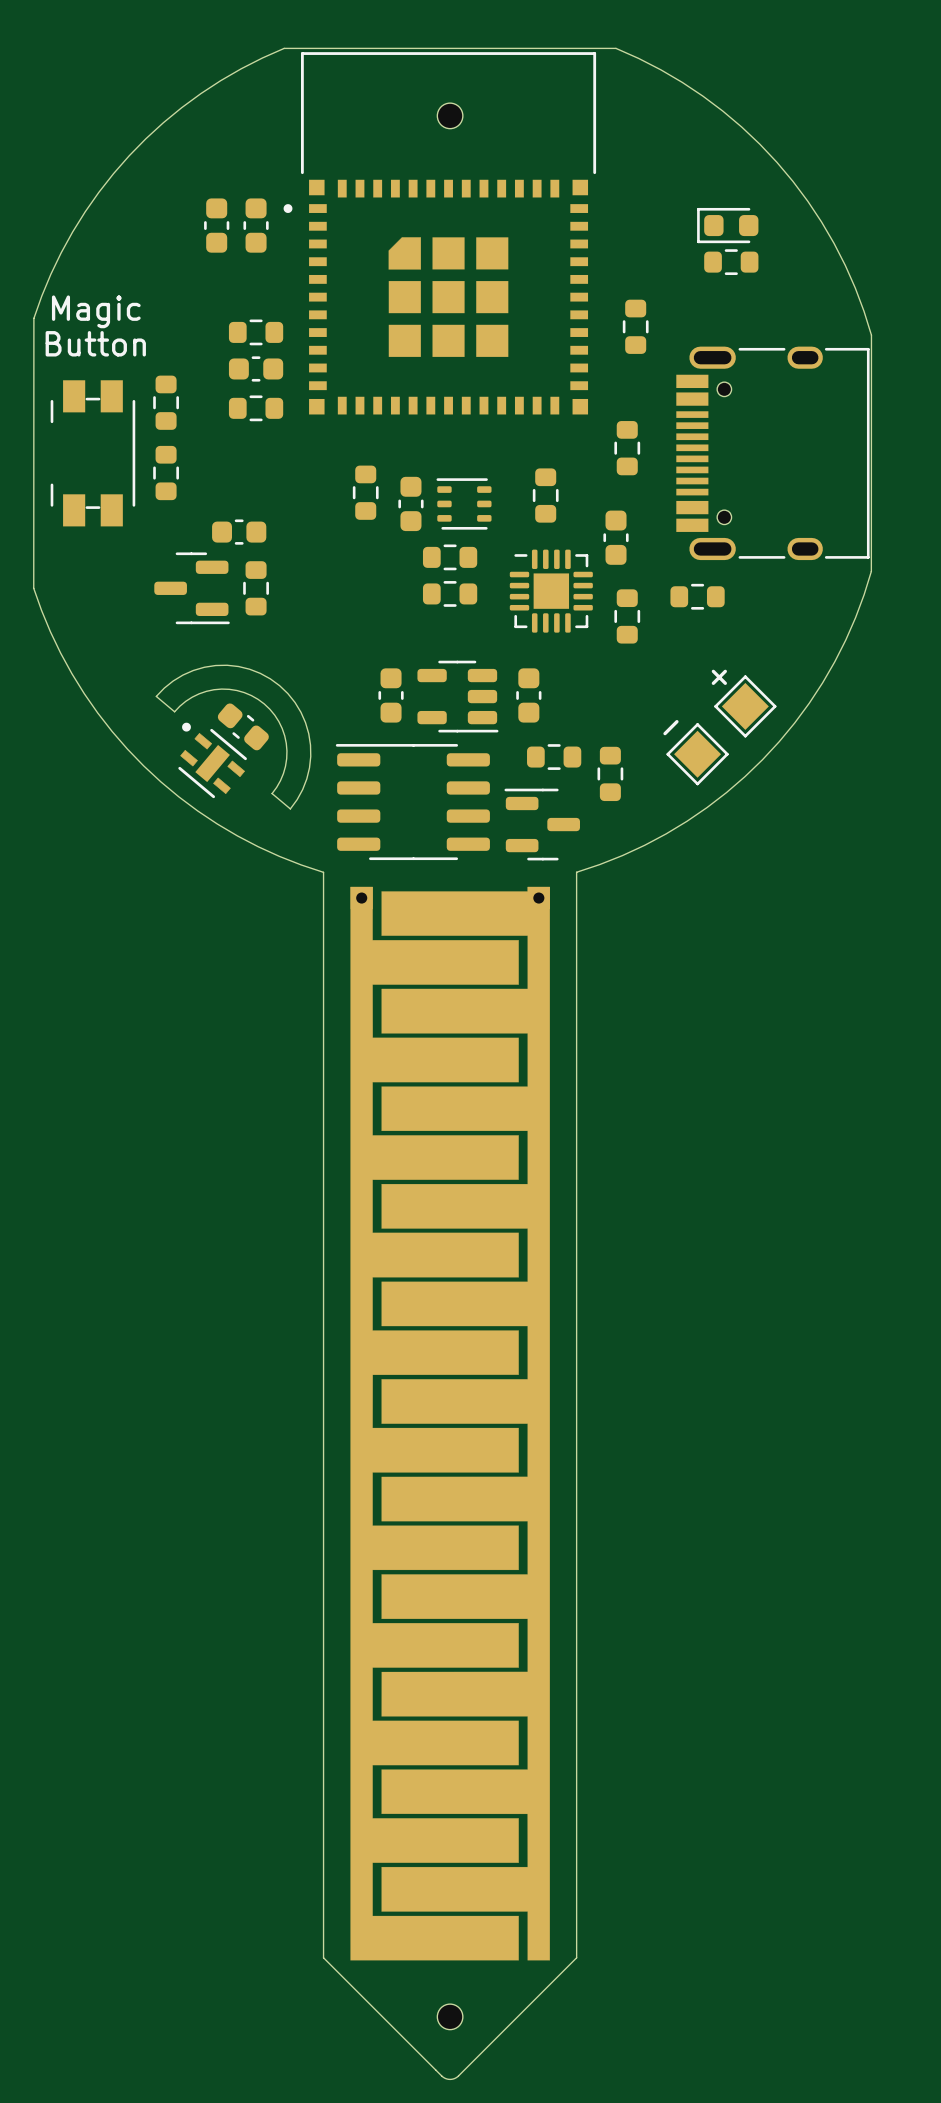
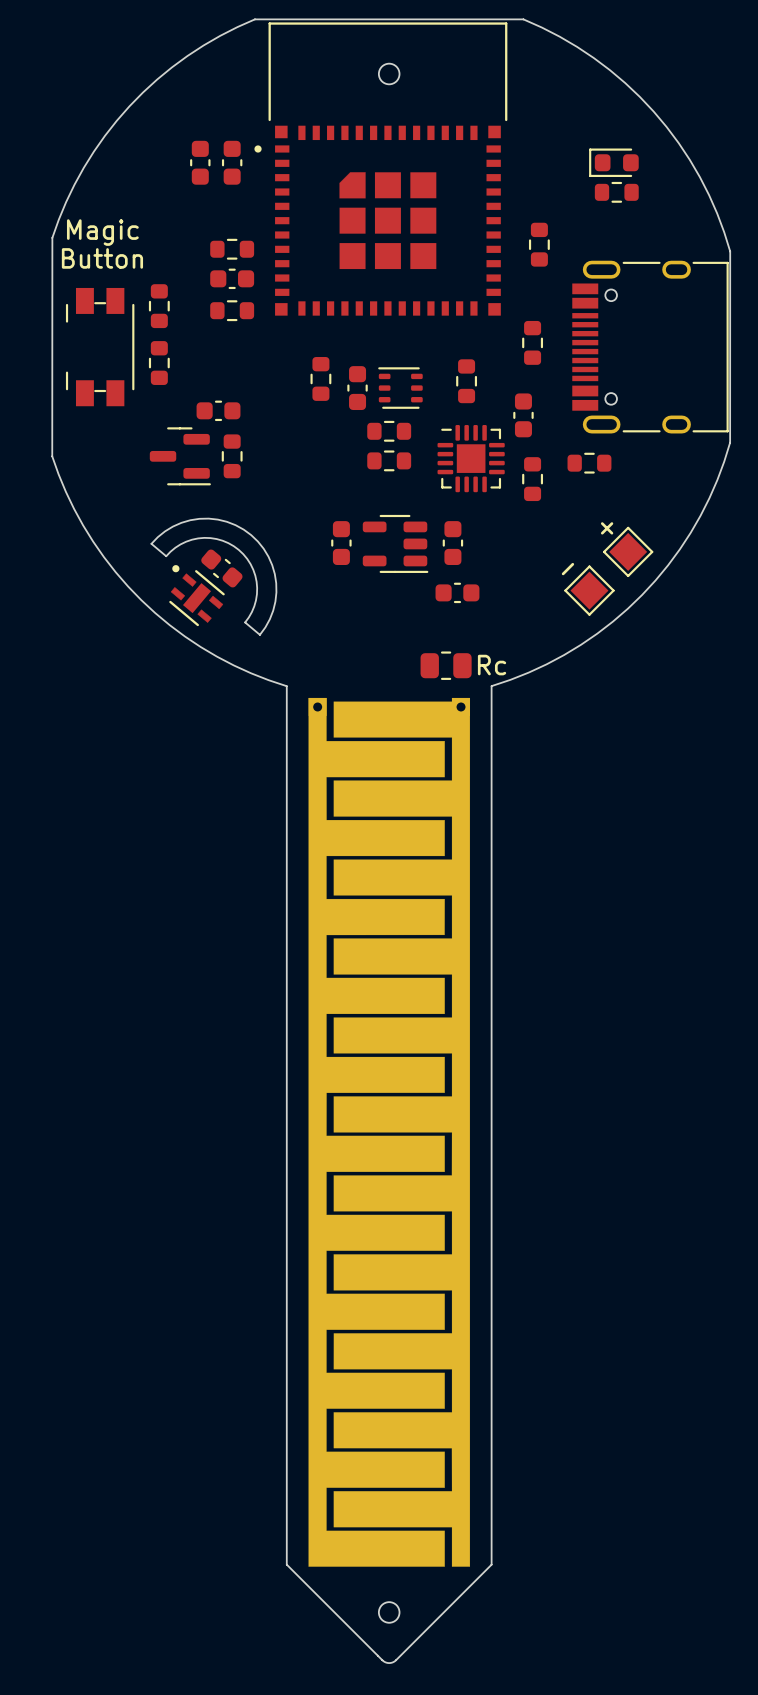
part footprint: [527, 744, 582, 770] -> [435, 582, 480, 604]
part: (610, 773) -> none
part: (412, 802) -> none
part: (542, 824) -> none
text: none -> Rc (492, 665)
part: none -> (446, 665)

